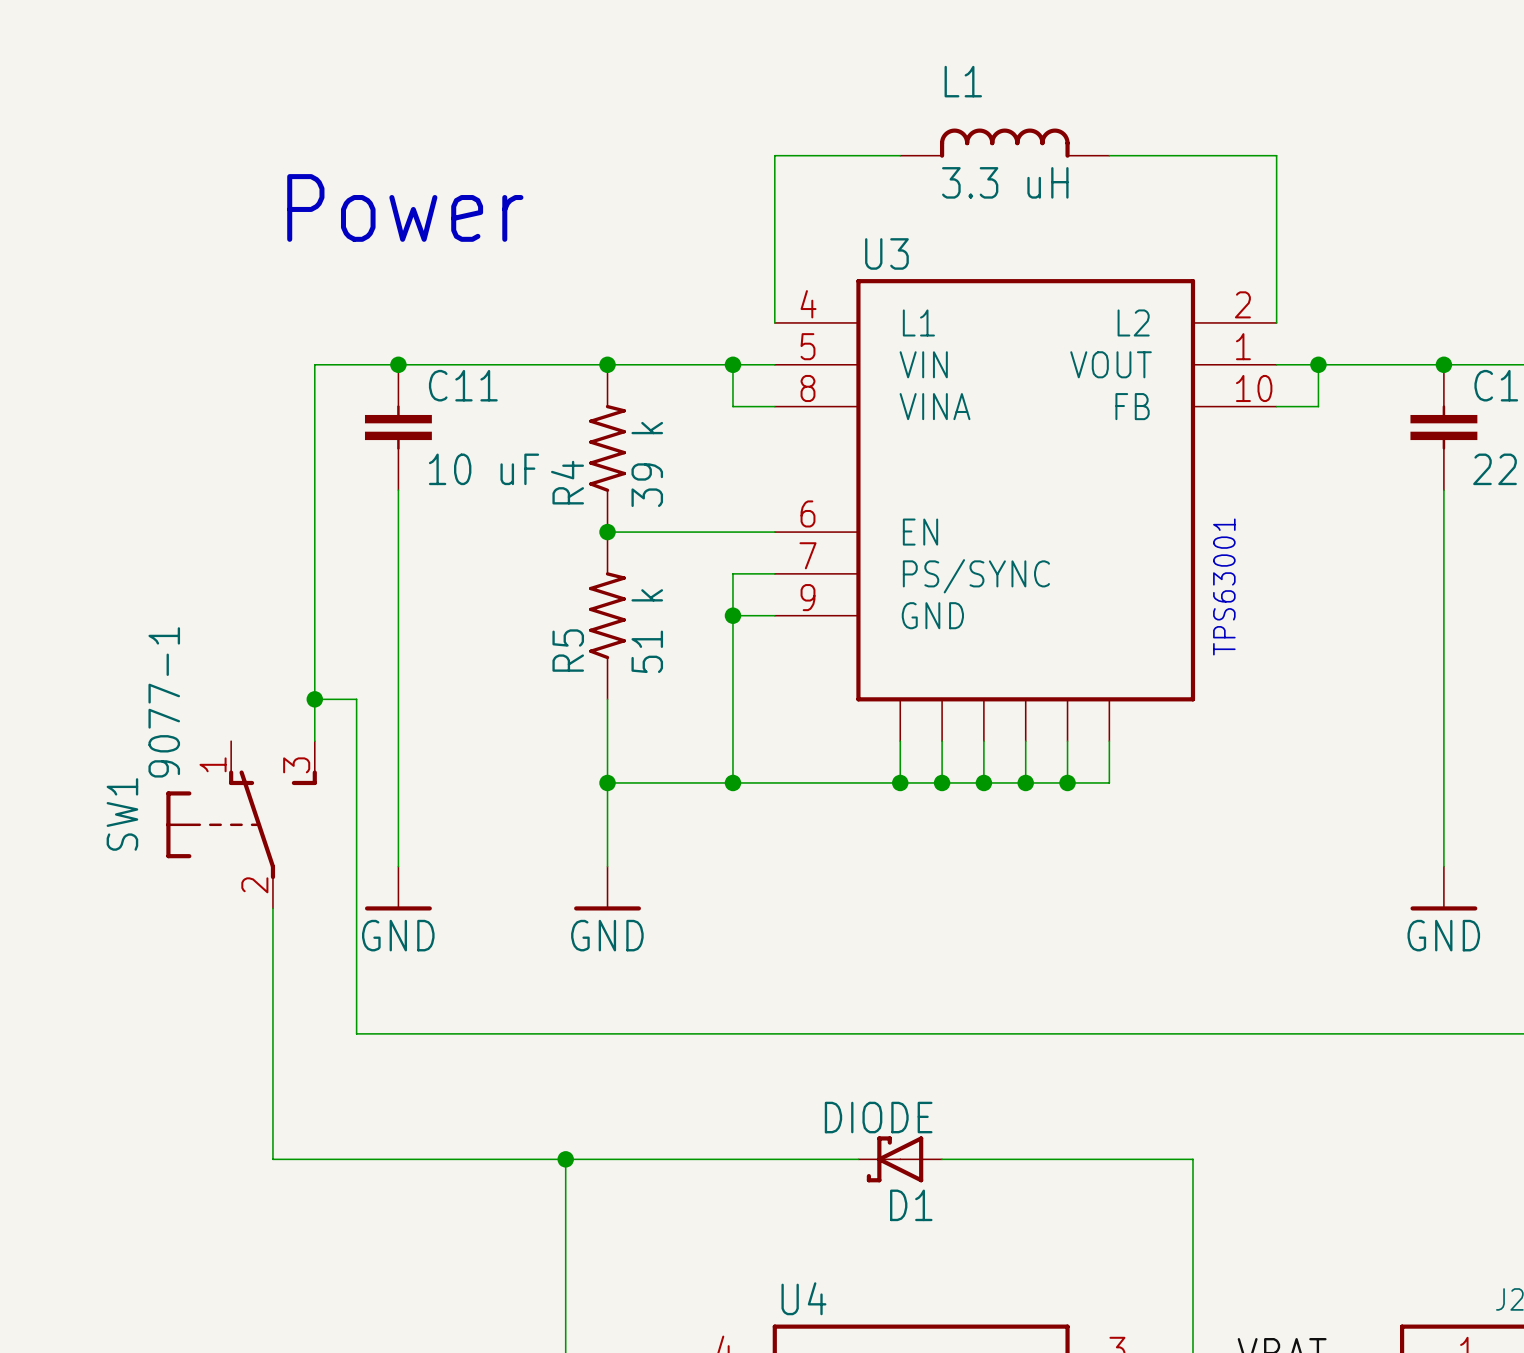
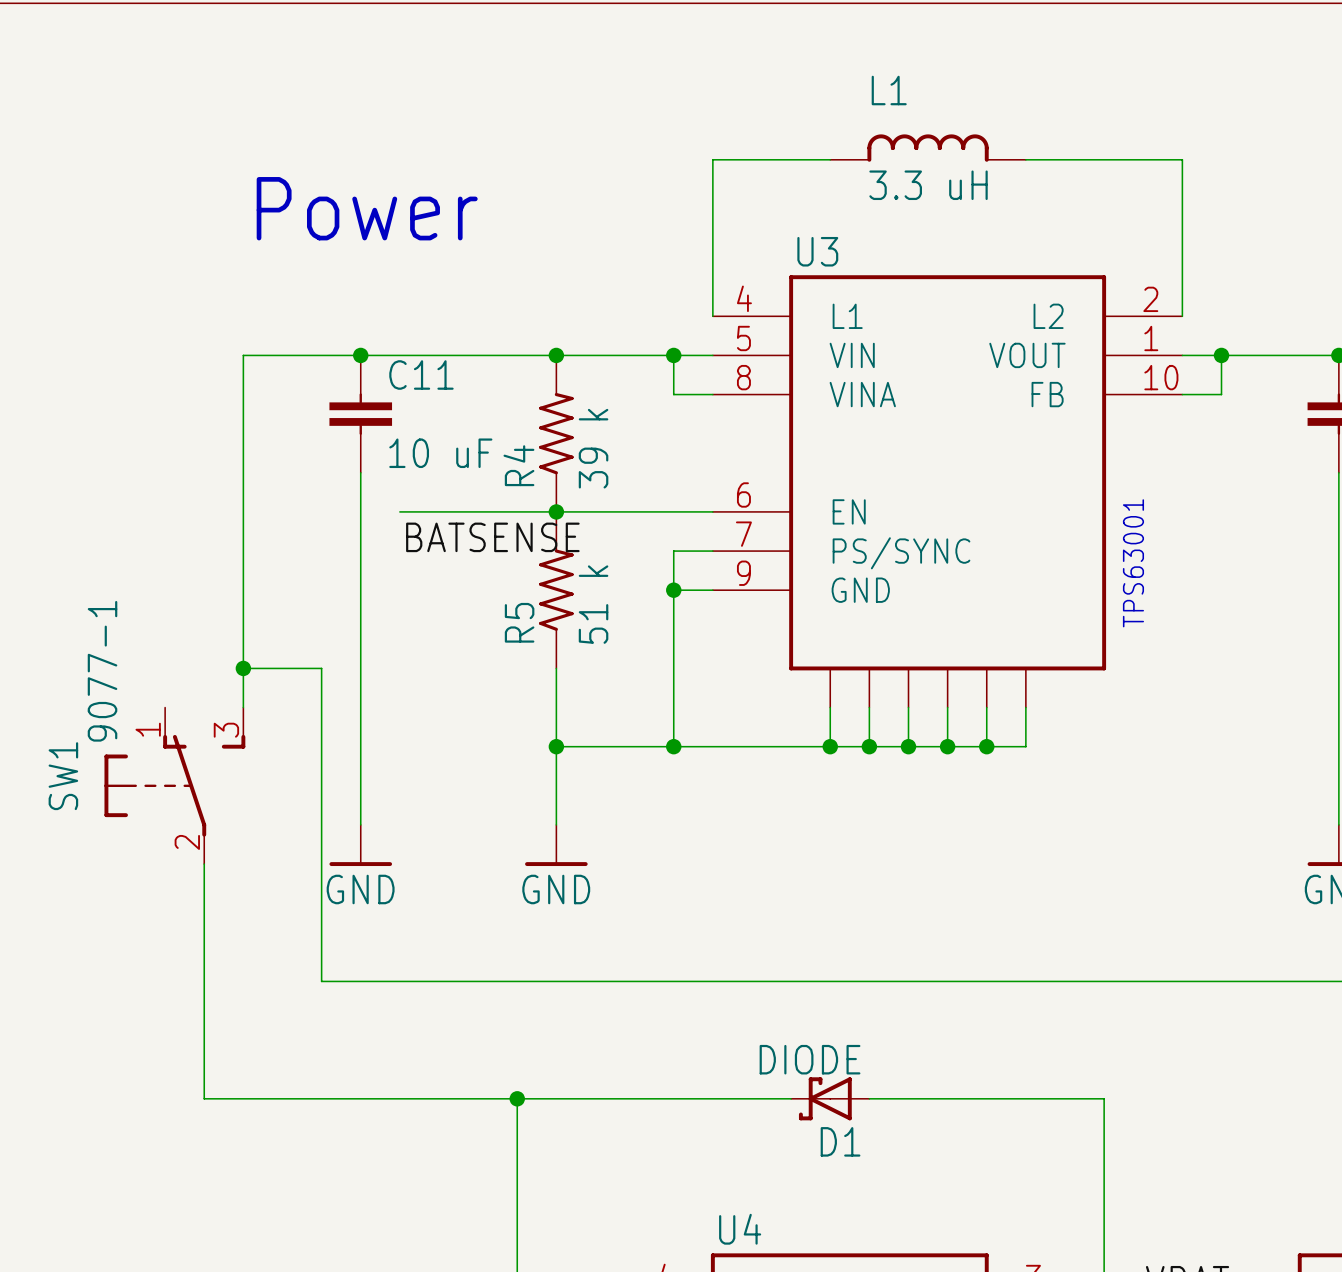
wire: (314, 364) (314, 741) -> (282, 355) (243, 355) (243, 707)
wire: none -> (399, 511) (556, 511)
label: none -> BATSENSE (492, 537)
wire: none -> (243, 668) (282, 668)
junction position: (314, 699) -> (243, 668)
SW1 position: (241, 824) -> (174, 785)
wire: (272, 908) (272, 1159) -> (204, 864) (204, 1098) (243, 1098)

